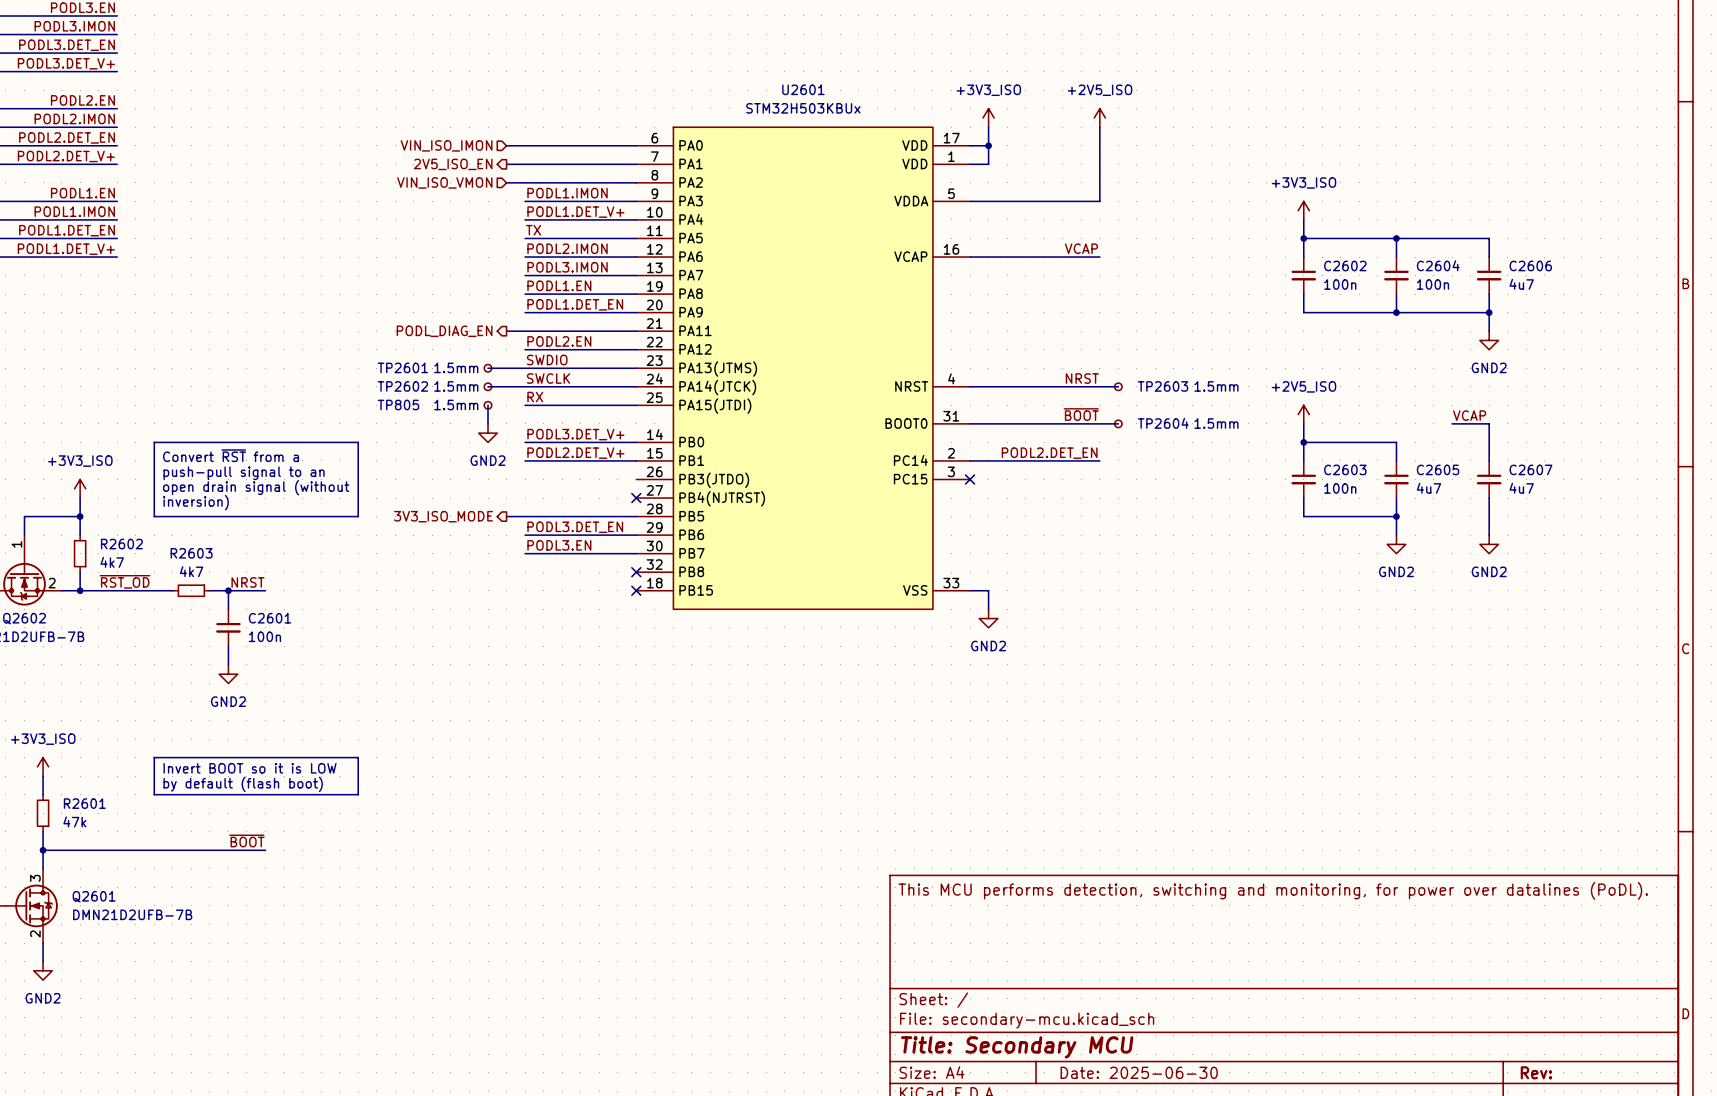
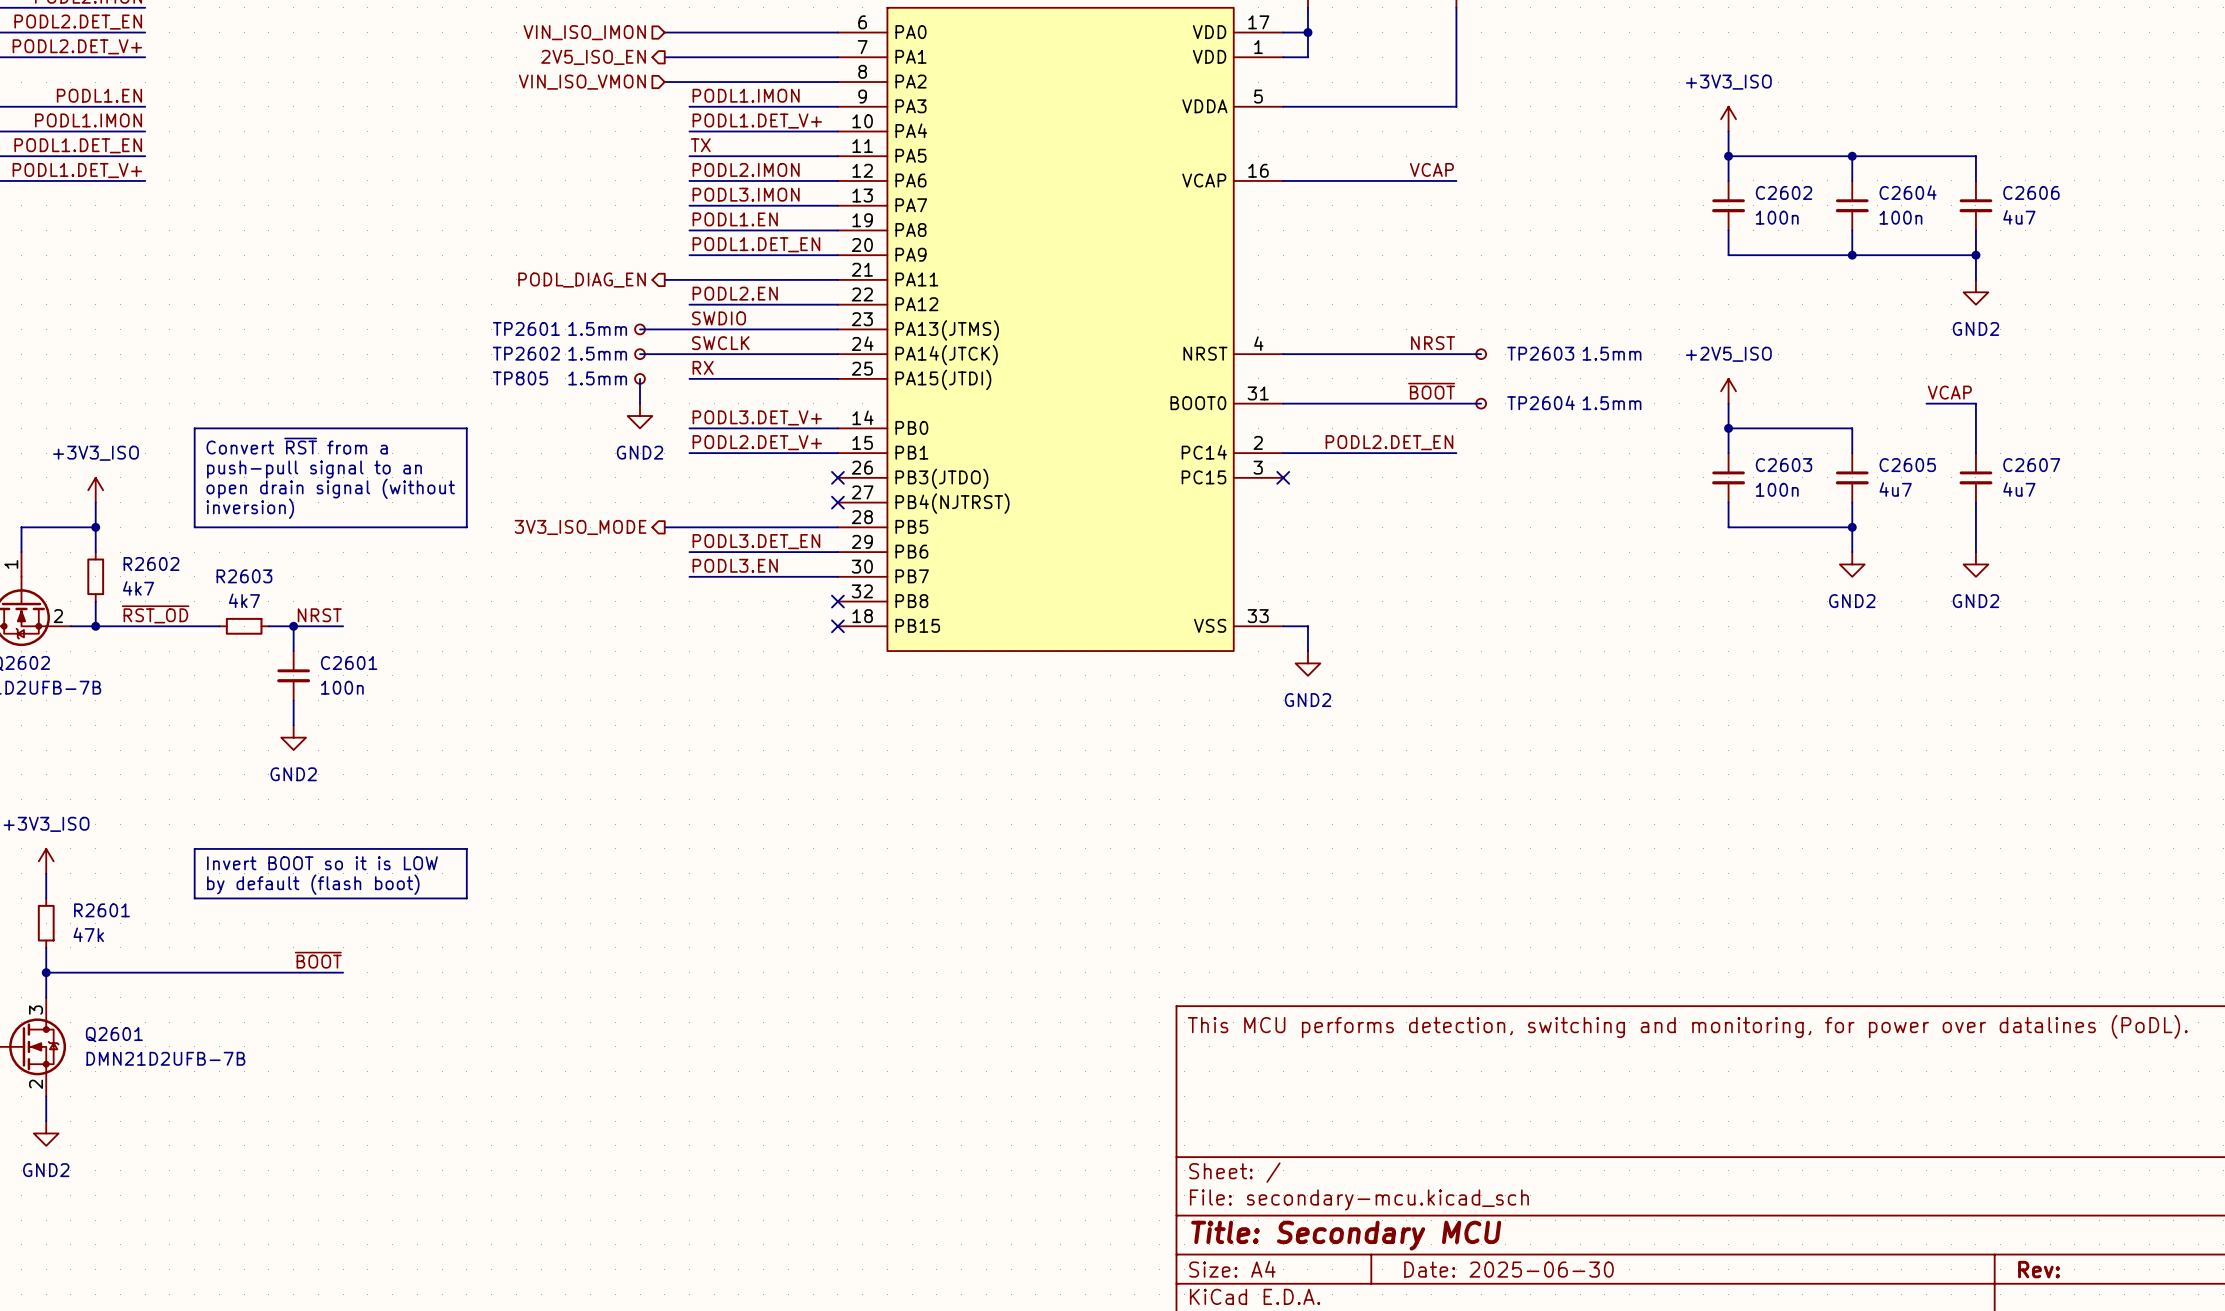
no-connect mark: none -> (837, 477)

